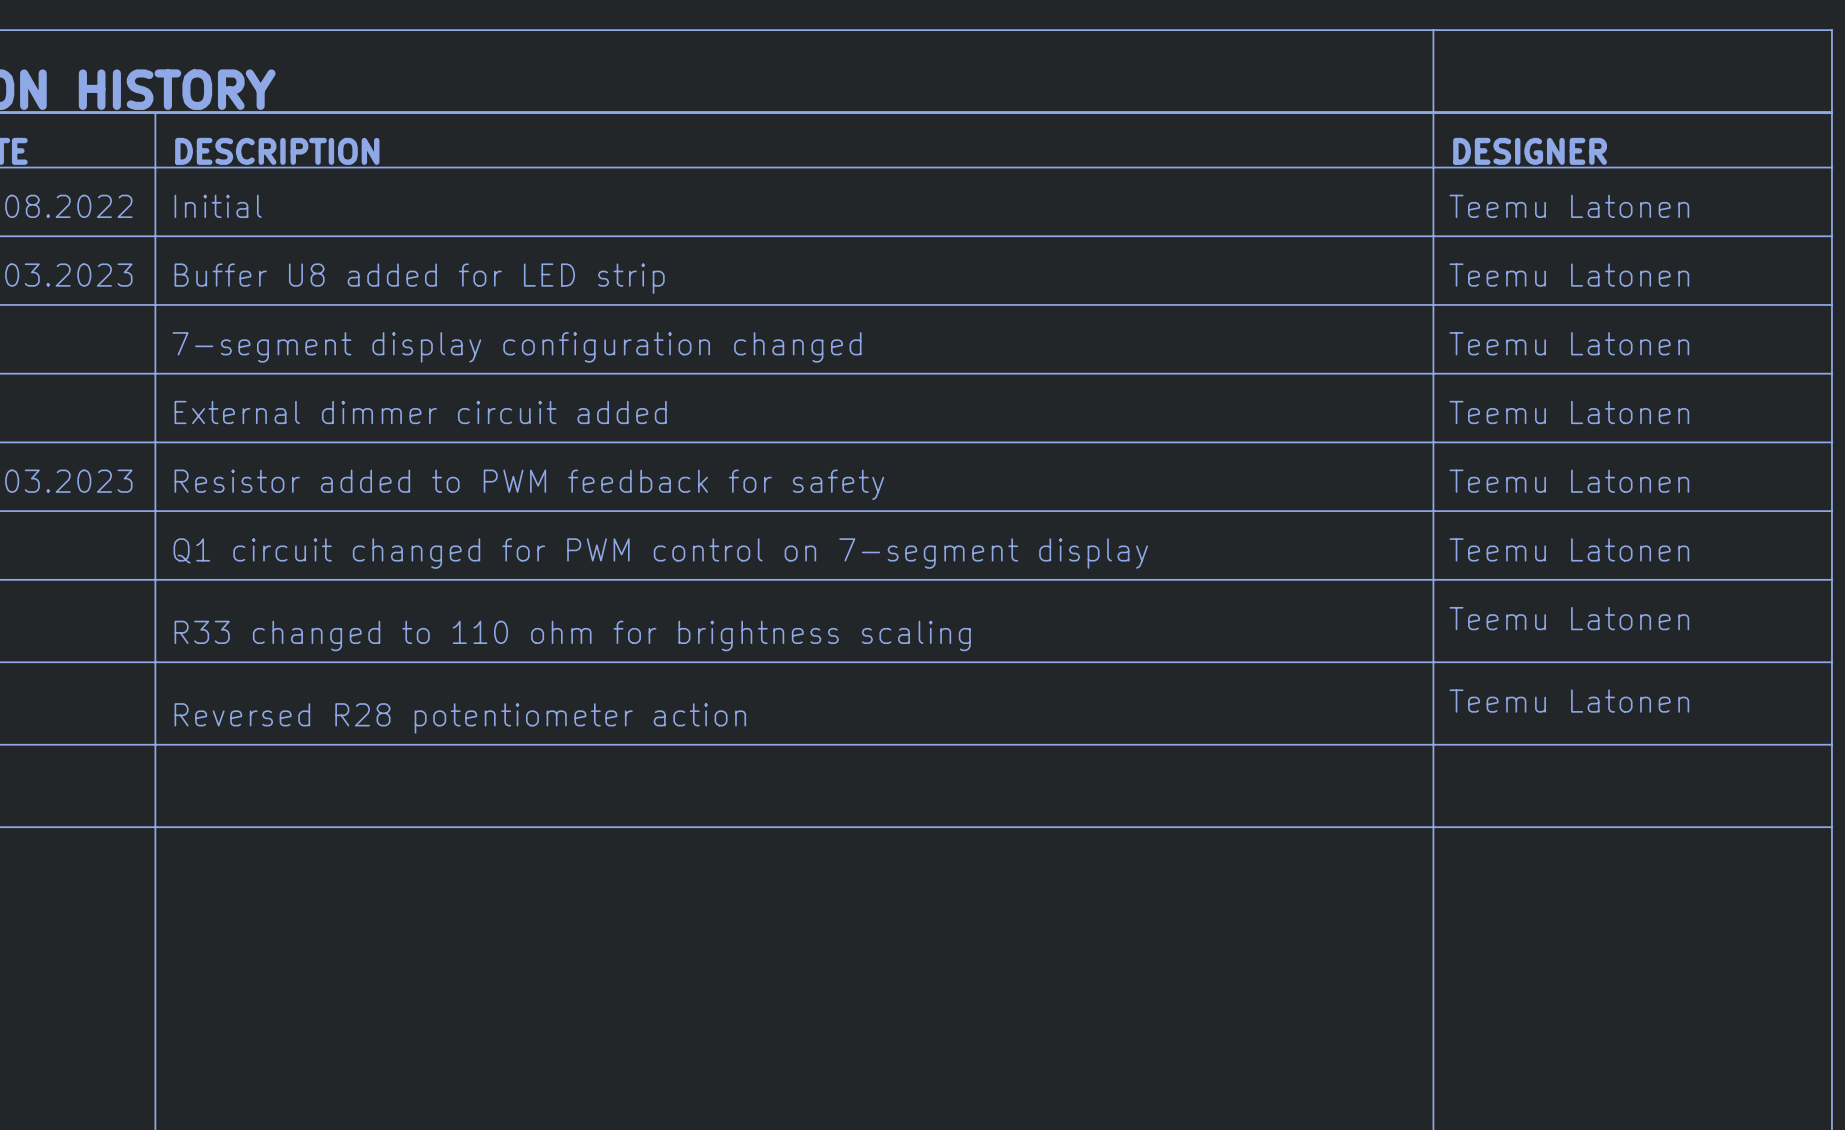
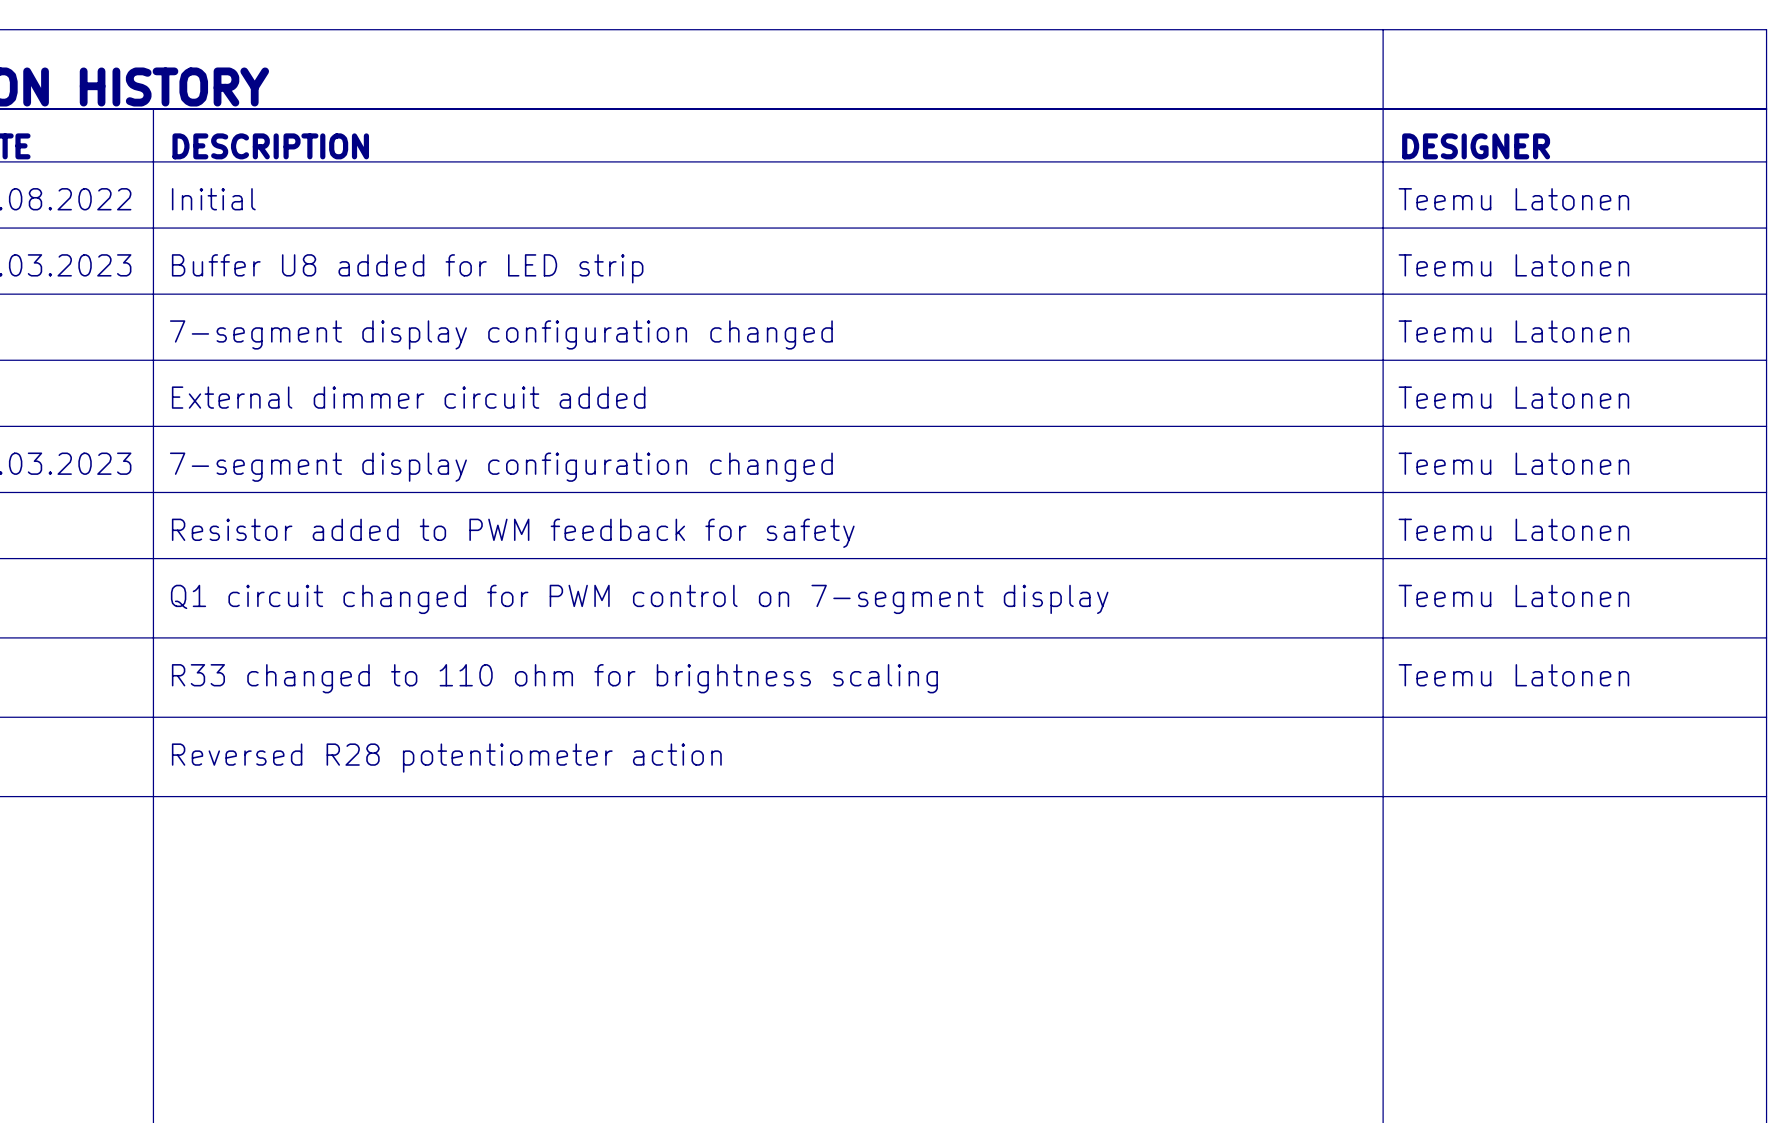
text: Resistor added to PWM feedback for safety (529, 484) -> 7-segment display configuration changed (501, 467)
text: Q1 circuit changed for PWM control on 7-segment display (660, 553) -> Resistor added to PWM feedback for safety (513, 533)
text: none -> Q1 circuit changed for PWM control on 7-segment display (639, 599)
text position: R33 changed to 110 ohm for brightness scaling (572, 635) -> R33 changed to 110 ohm for brightness scaling (554, 678)
text position: Reversed R28 potentiometer action (460, 718) -> Reversed R28 potentiometer action (446, 758)

